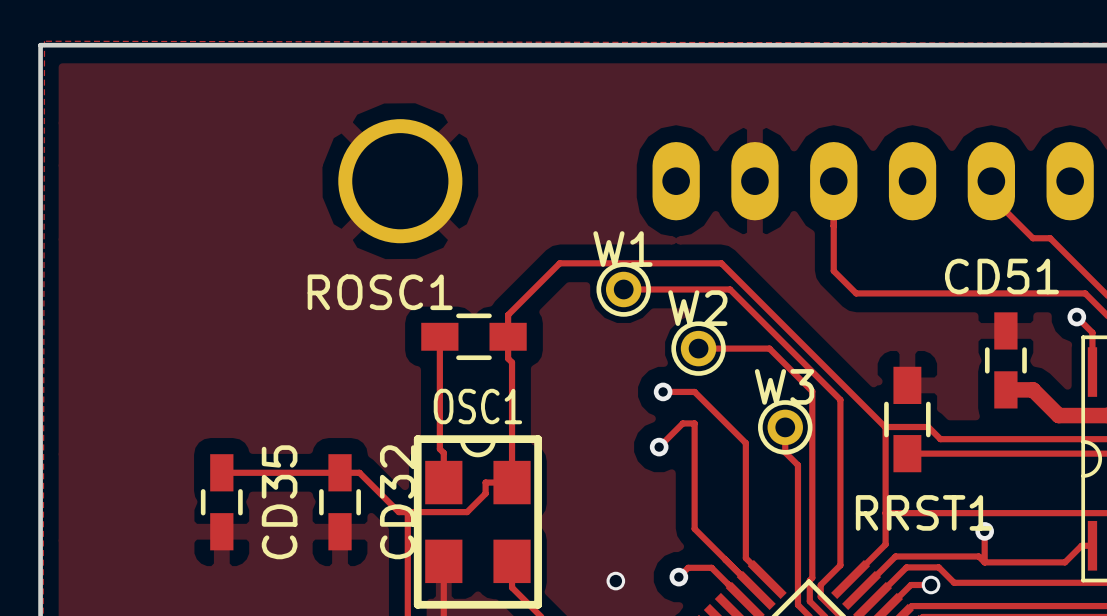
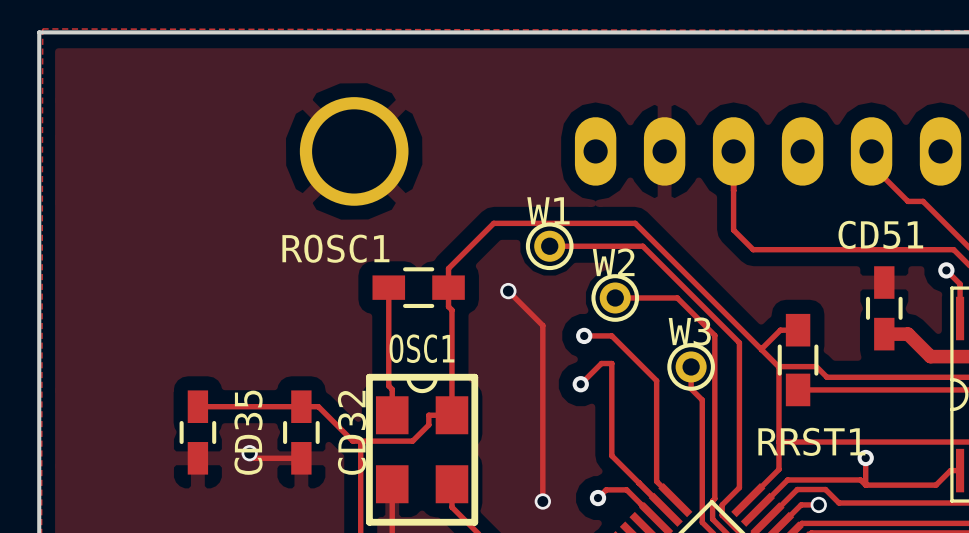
track: none -> (508, 291) (542, 325) (542, 501)
via: none -> (508, 291)
track: none -> (798, 330) (780, 330) (761, 349)
track: none -> (249, 453) (254, 458) (301, 458)
via: none -> (249, 453)

